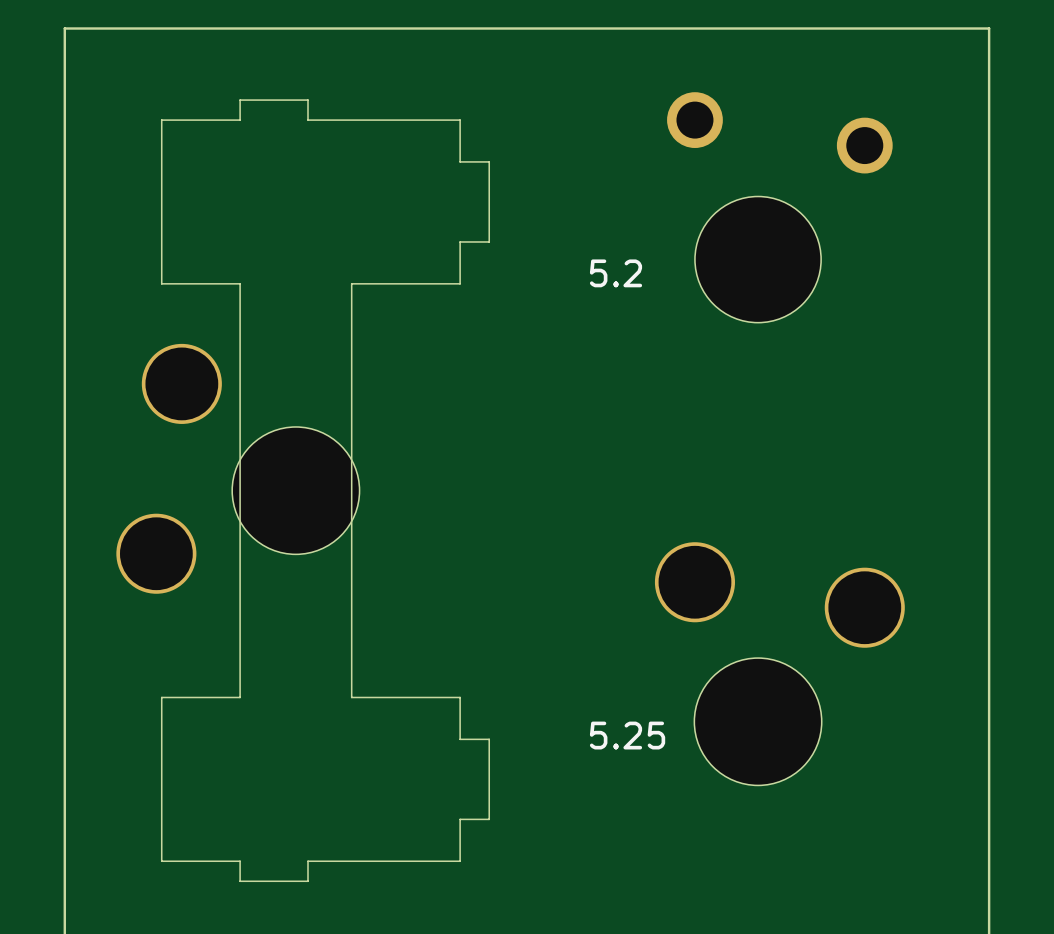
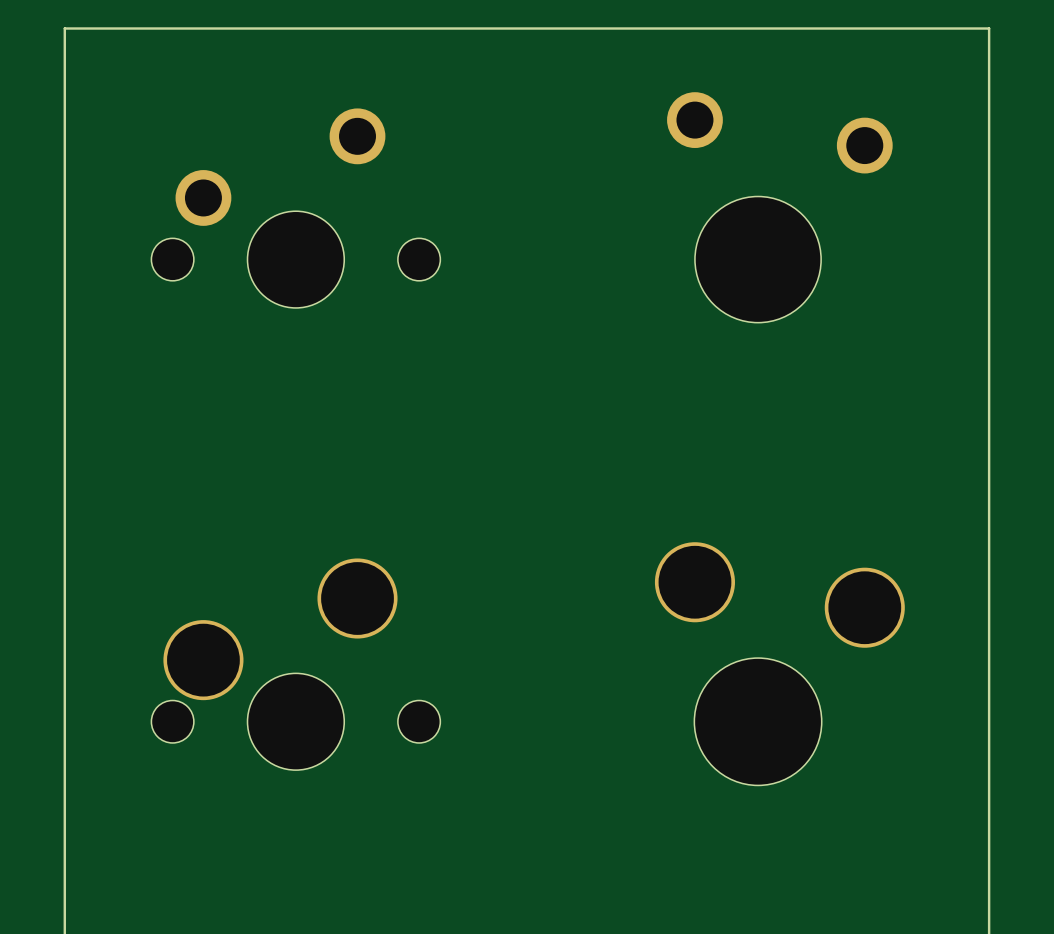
board edge: (240, 100) (240, 120) (161, 120) (161, 283) (240, 283) (240, 697) (161, 697) (161, 861) (240, 861) (240, 881) (307, 881) (307, 861) (460, 861) (460, 819) (489, 819) (489, 739) (460, 739) (460, 697) (351, 697) (351, 283) (460, 283) (460, 241) (489, 241) (489, 161) (460, 161) (460, 120) (307, 120) (307, 100) (240, 100) -> none
part: none -> (295, 208)
text: 5.2 (616, 273) -> none
part: (237, 468) -> none
part: none -> (295, 664)
text: 5.25 (627, 735) -> none

